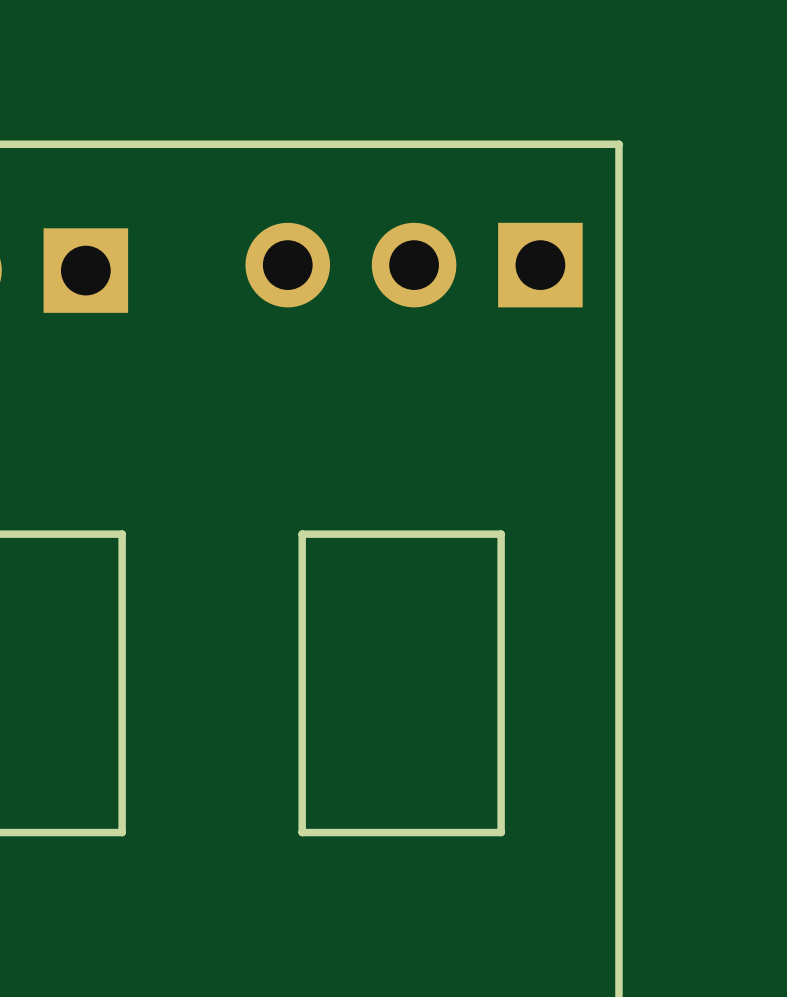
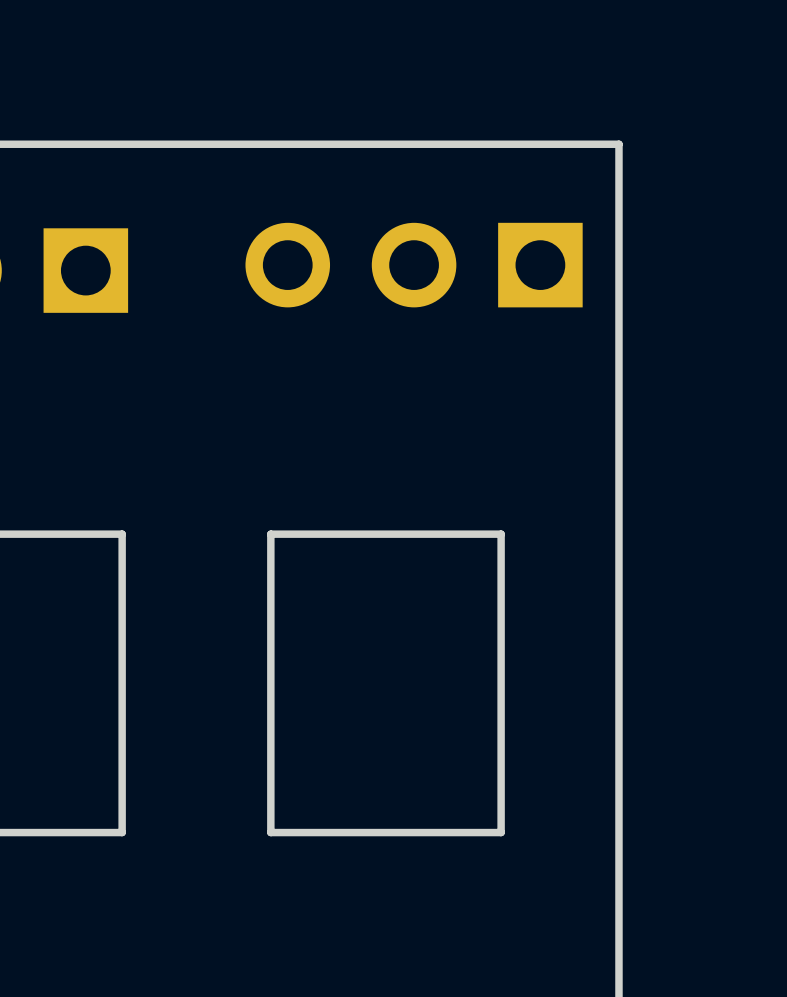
board edge: (302, 534) (302, 832) -> (302, 534) (270, 534) (270, 832) (302, 832)

